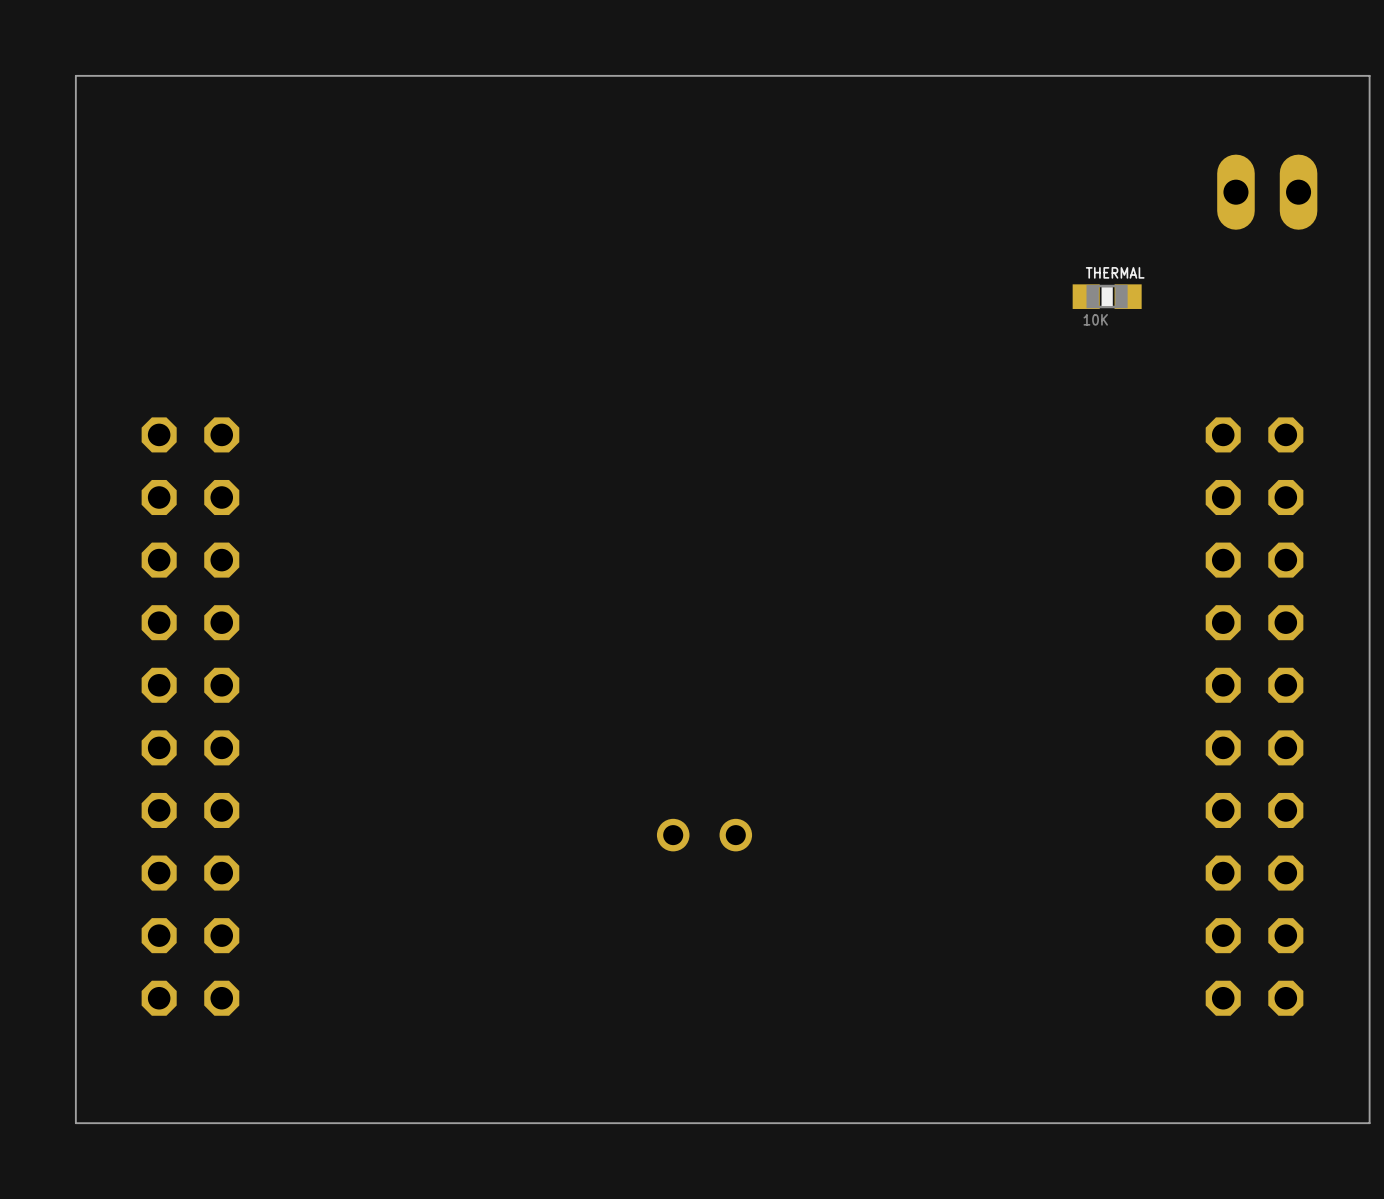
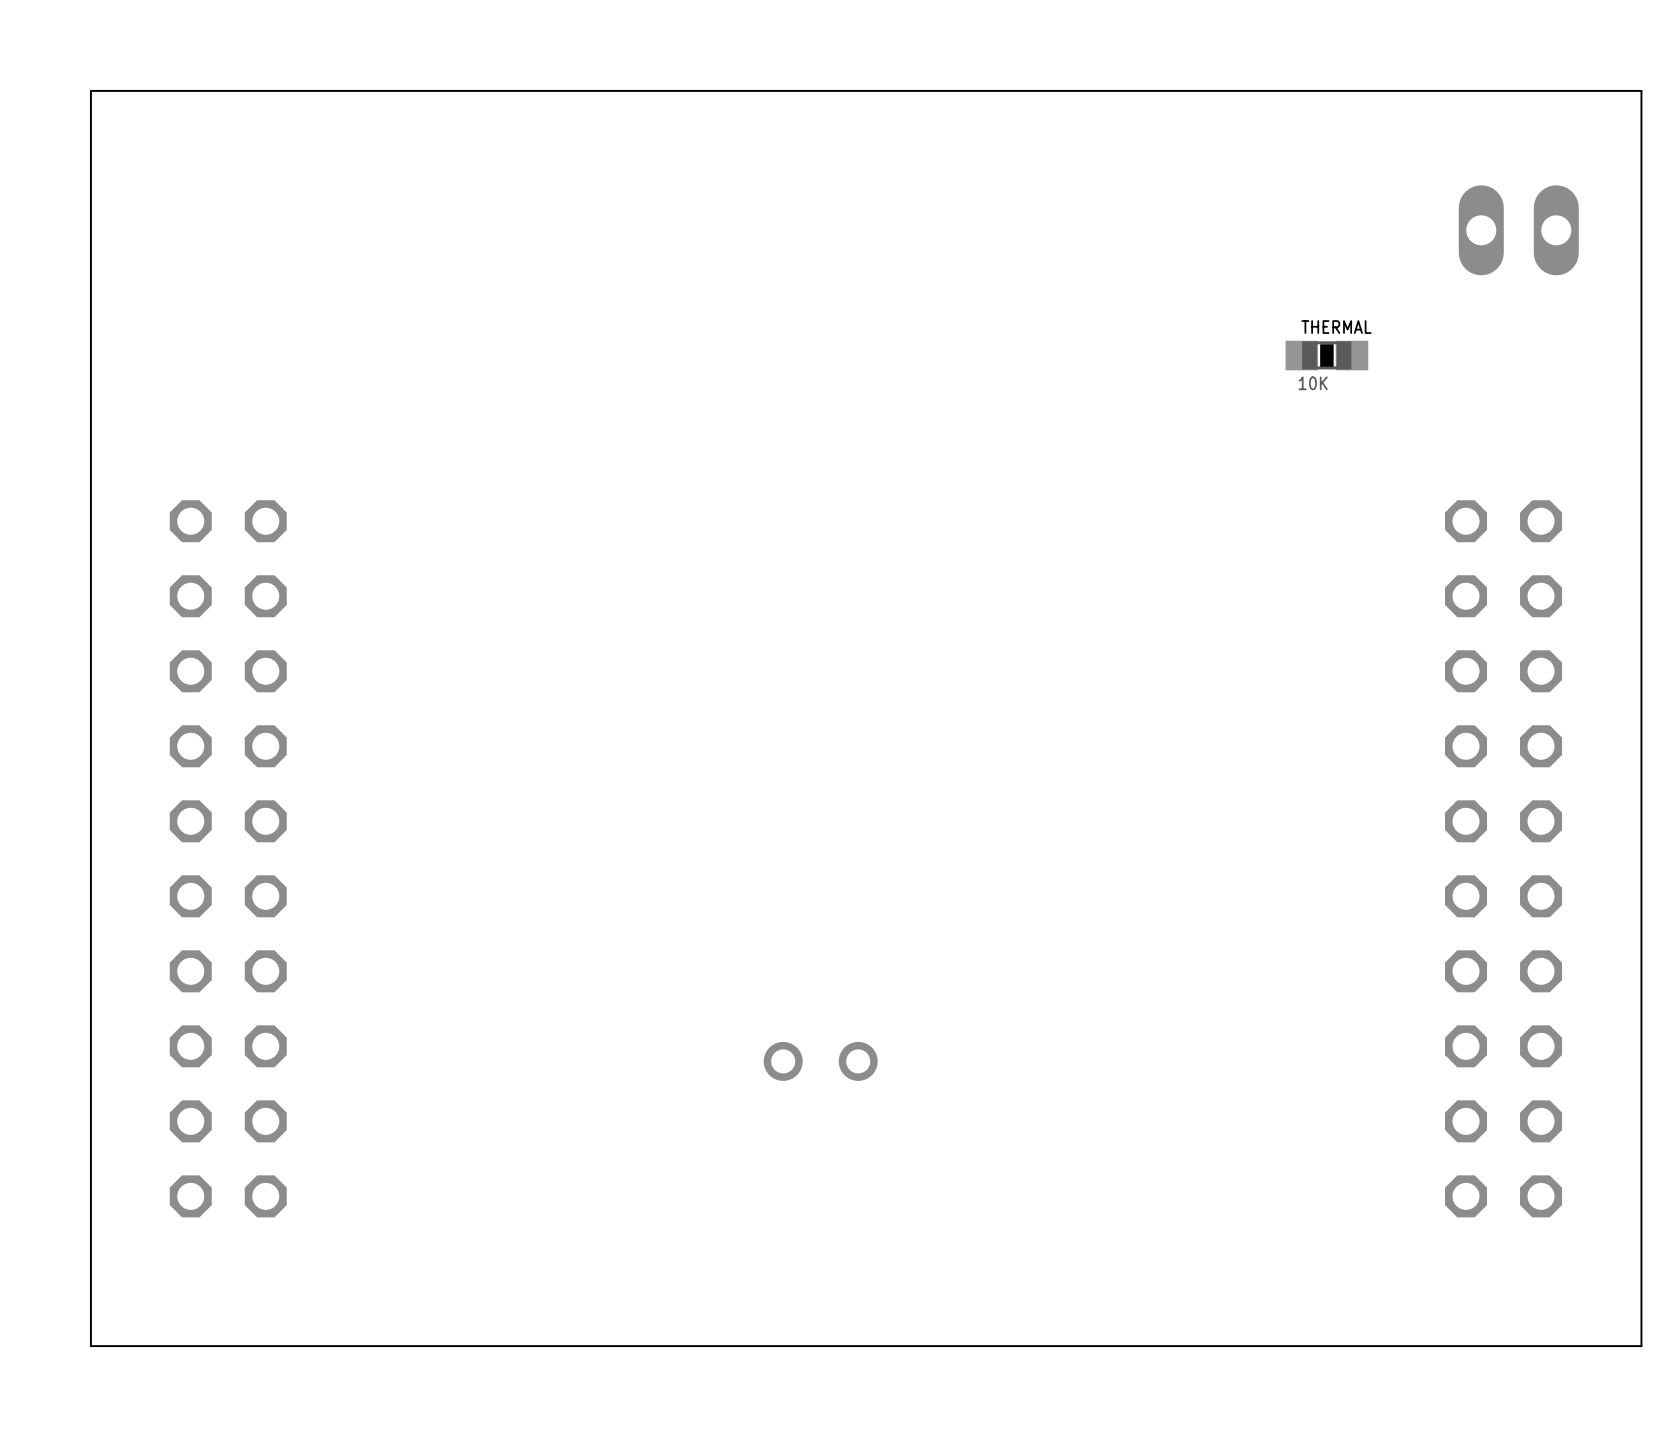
part position: (704, 835) -> (820, 1061)

